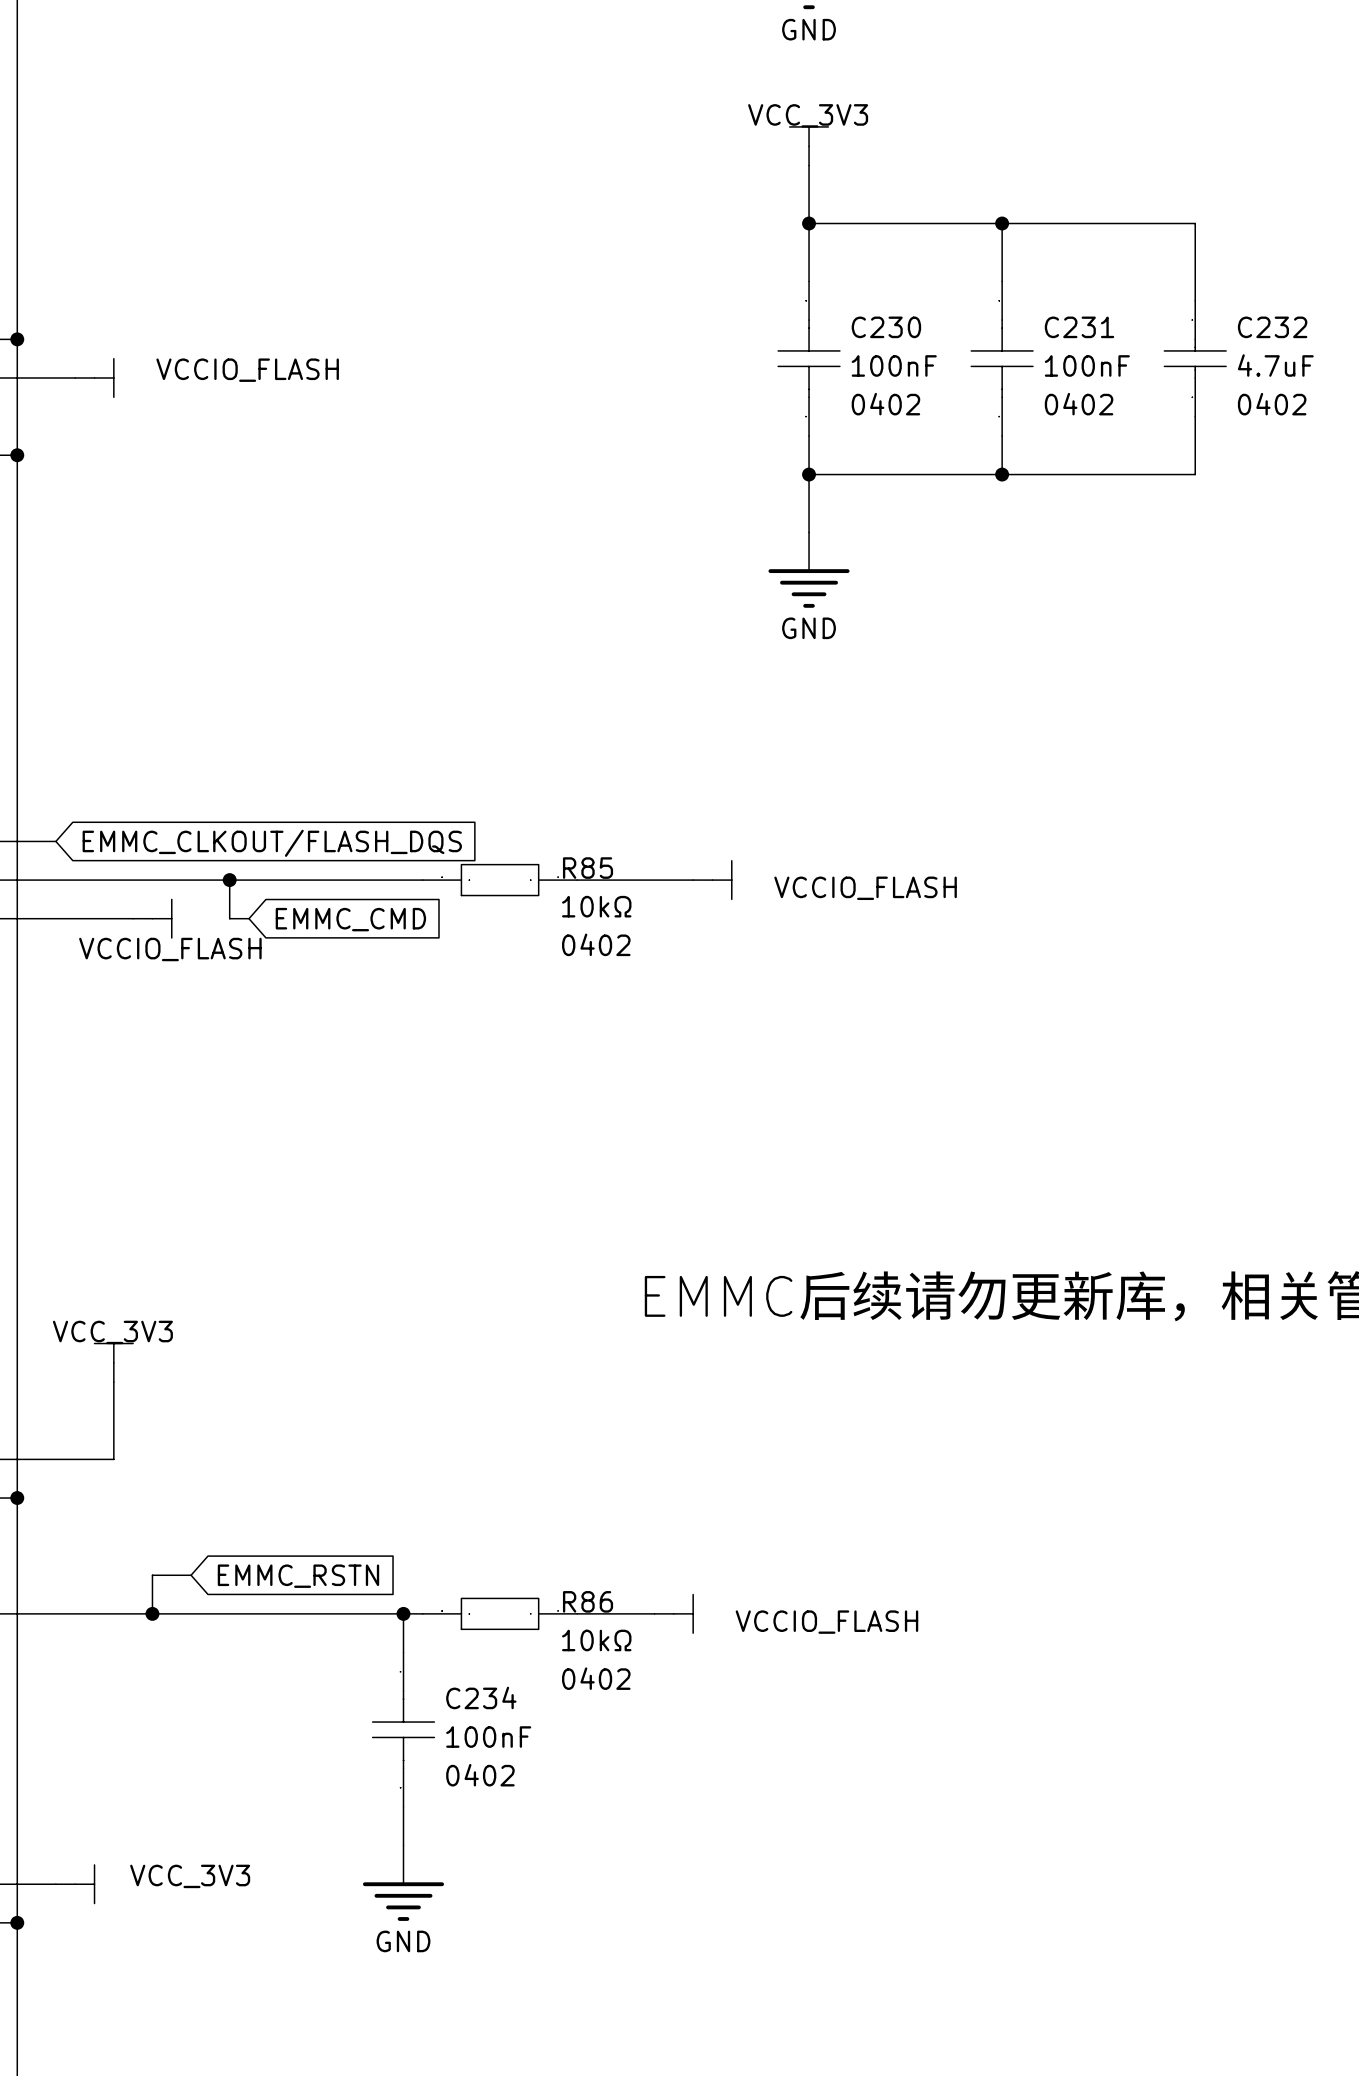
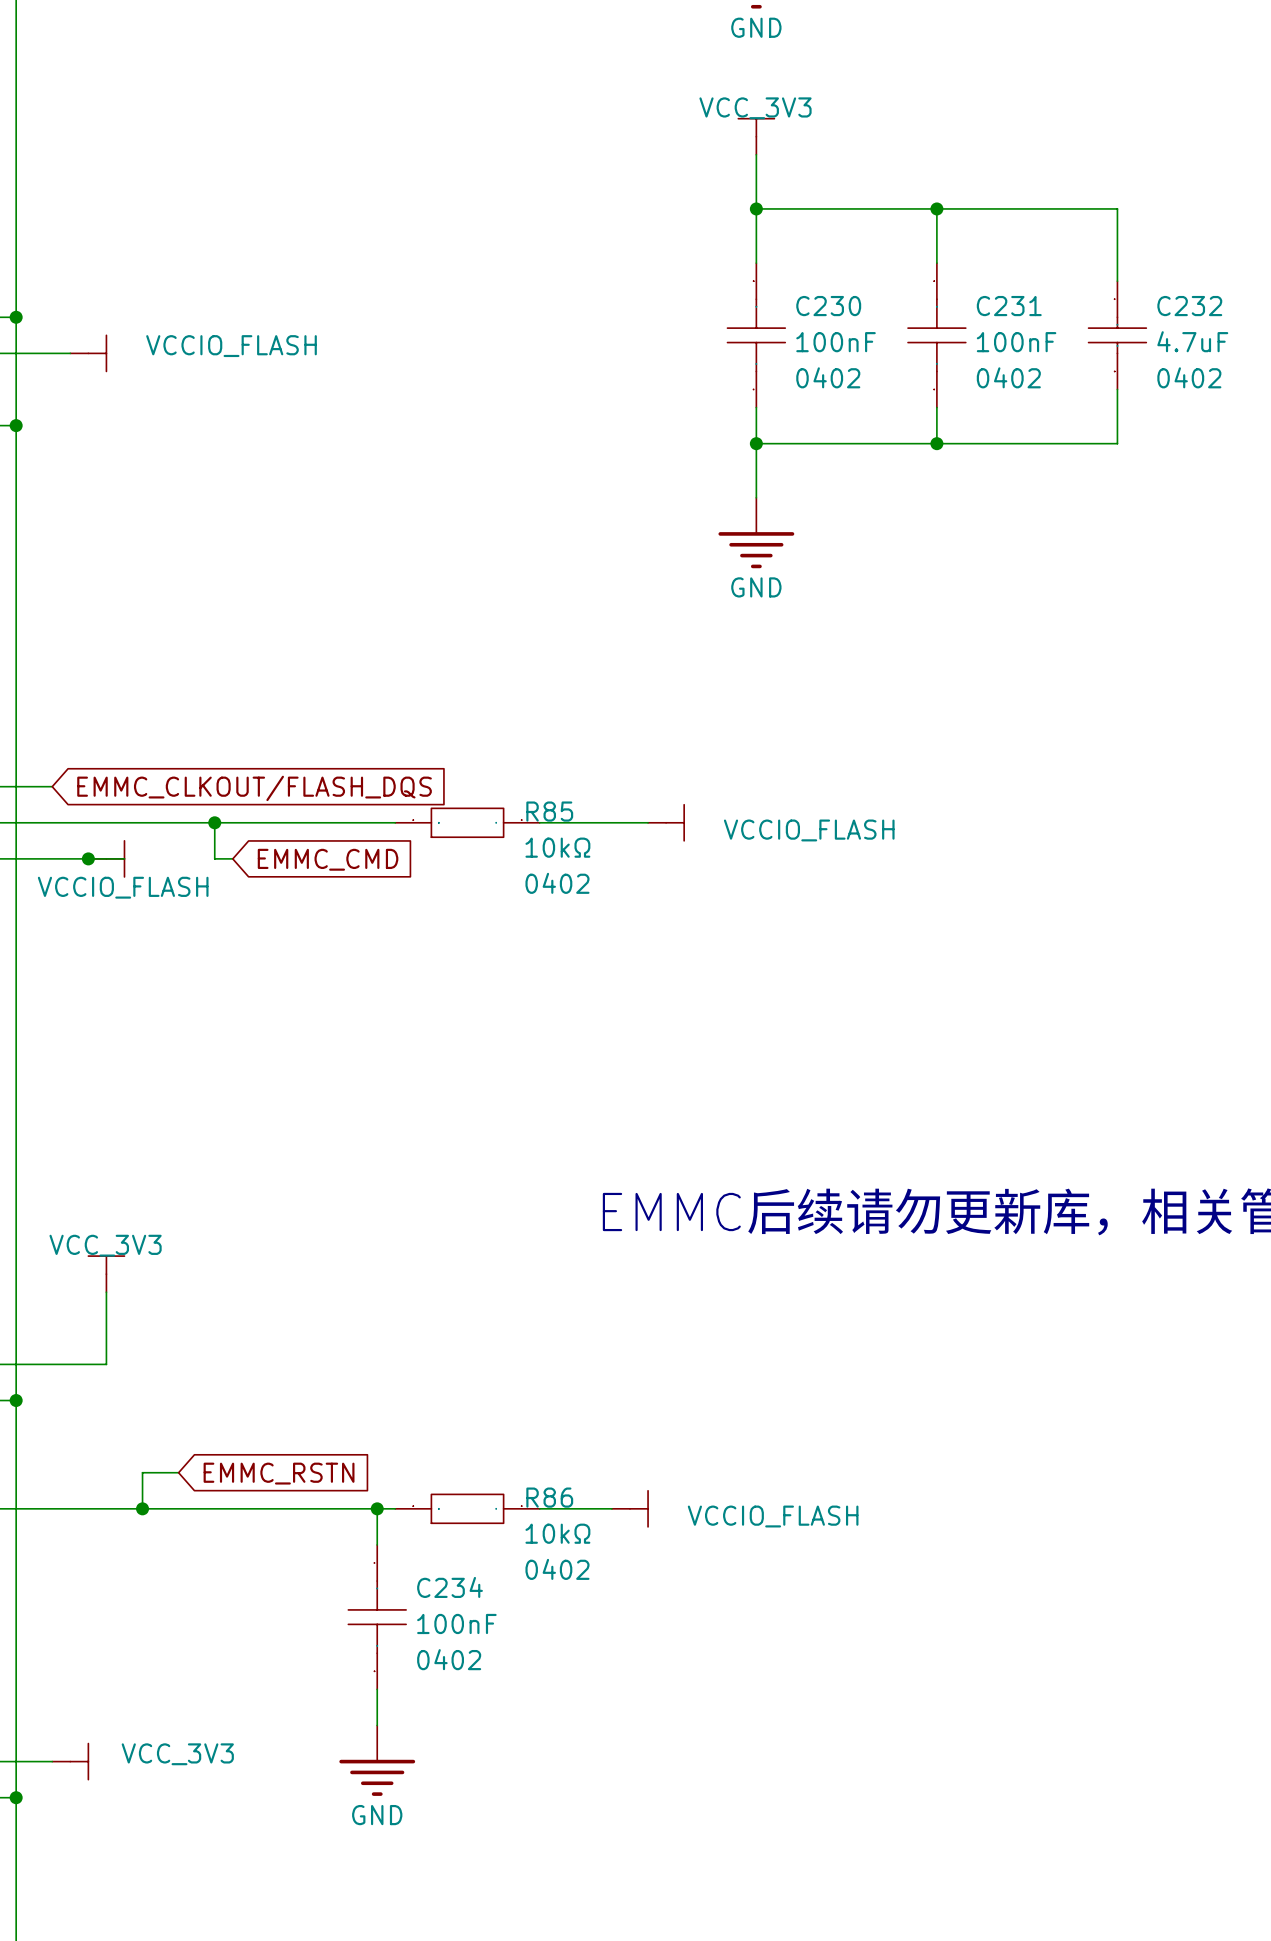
junction: none -> (88, 858)
power symbol position: VCCIO_FLASH (152, 918) -> VCCIO_FLASH (106, 858)

